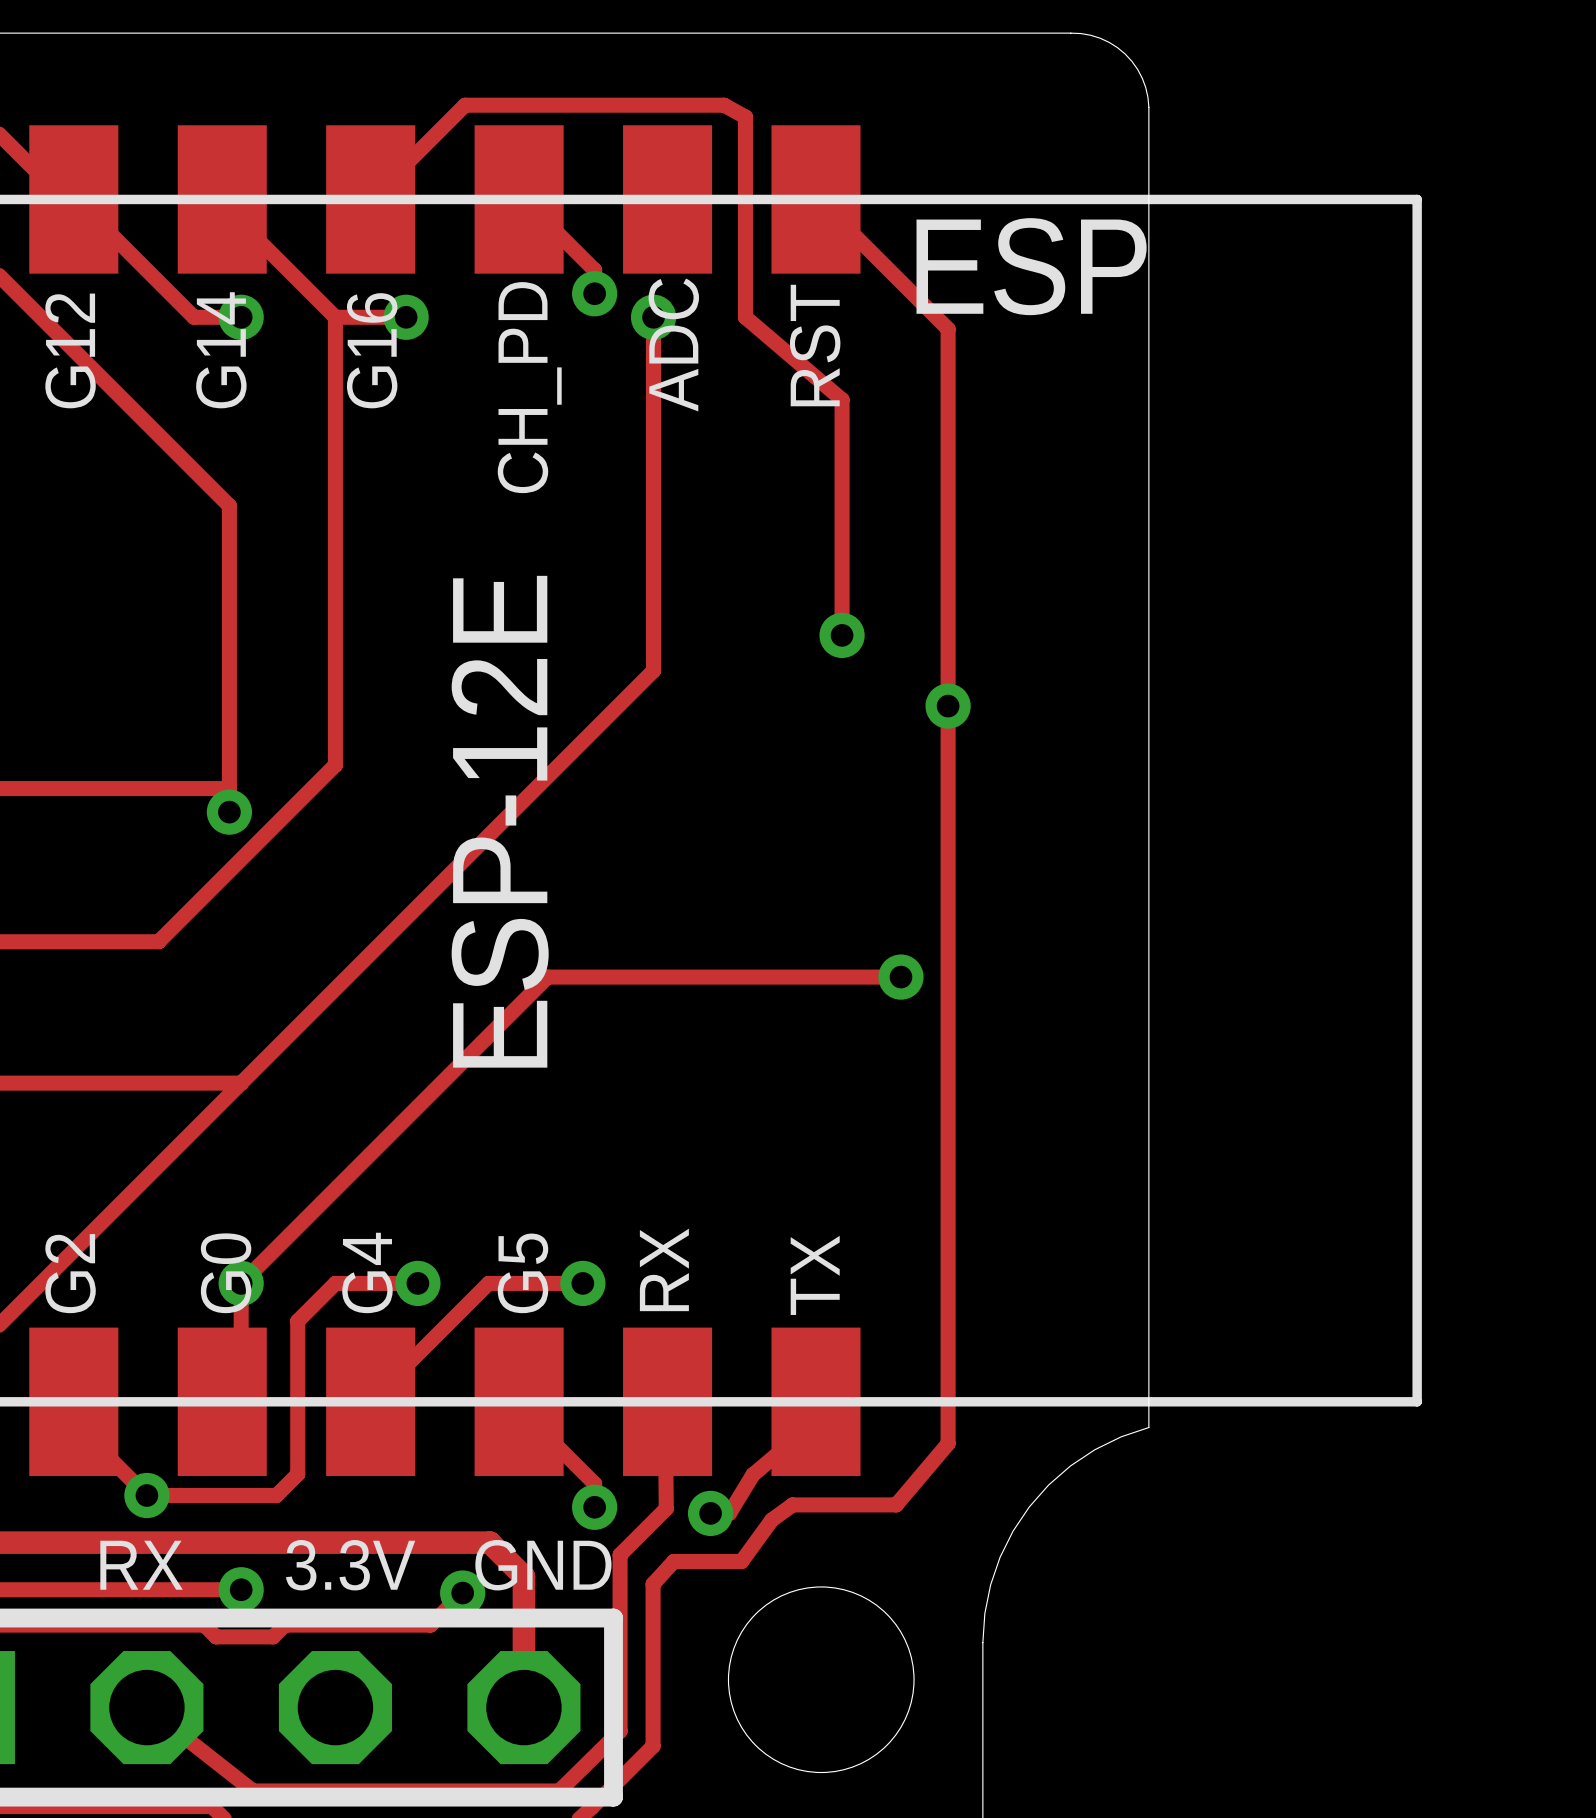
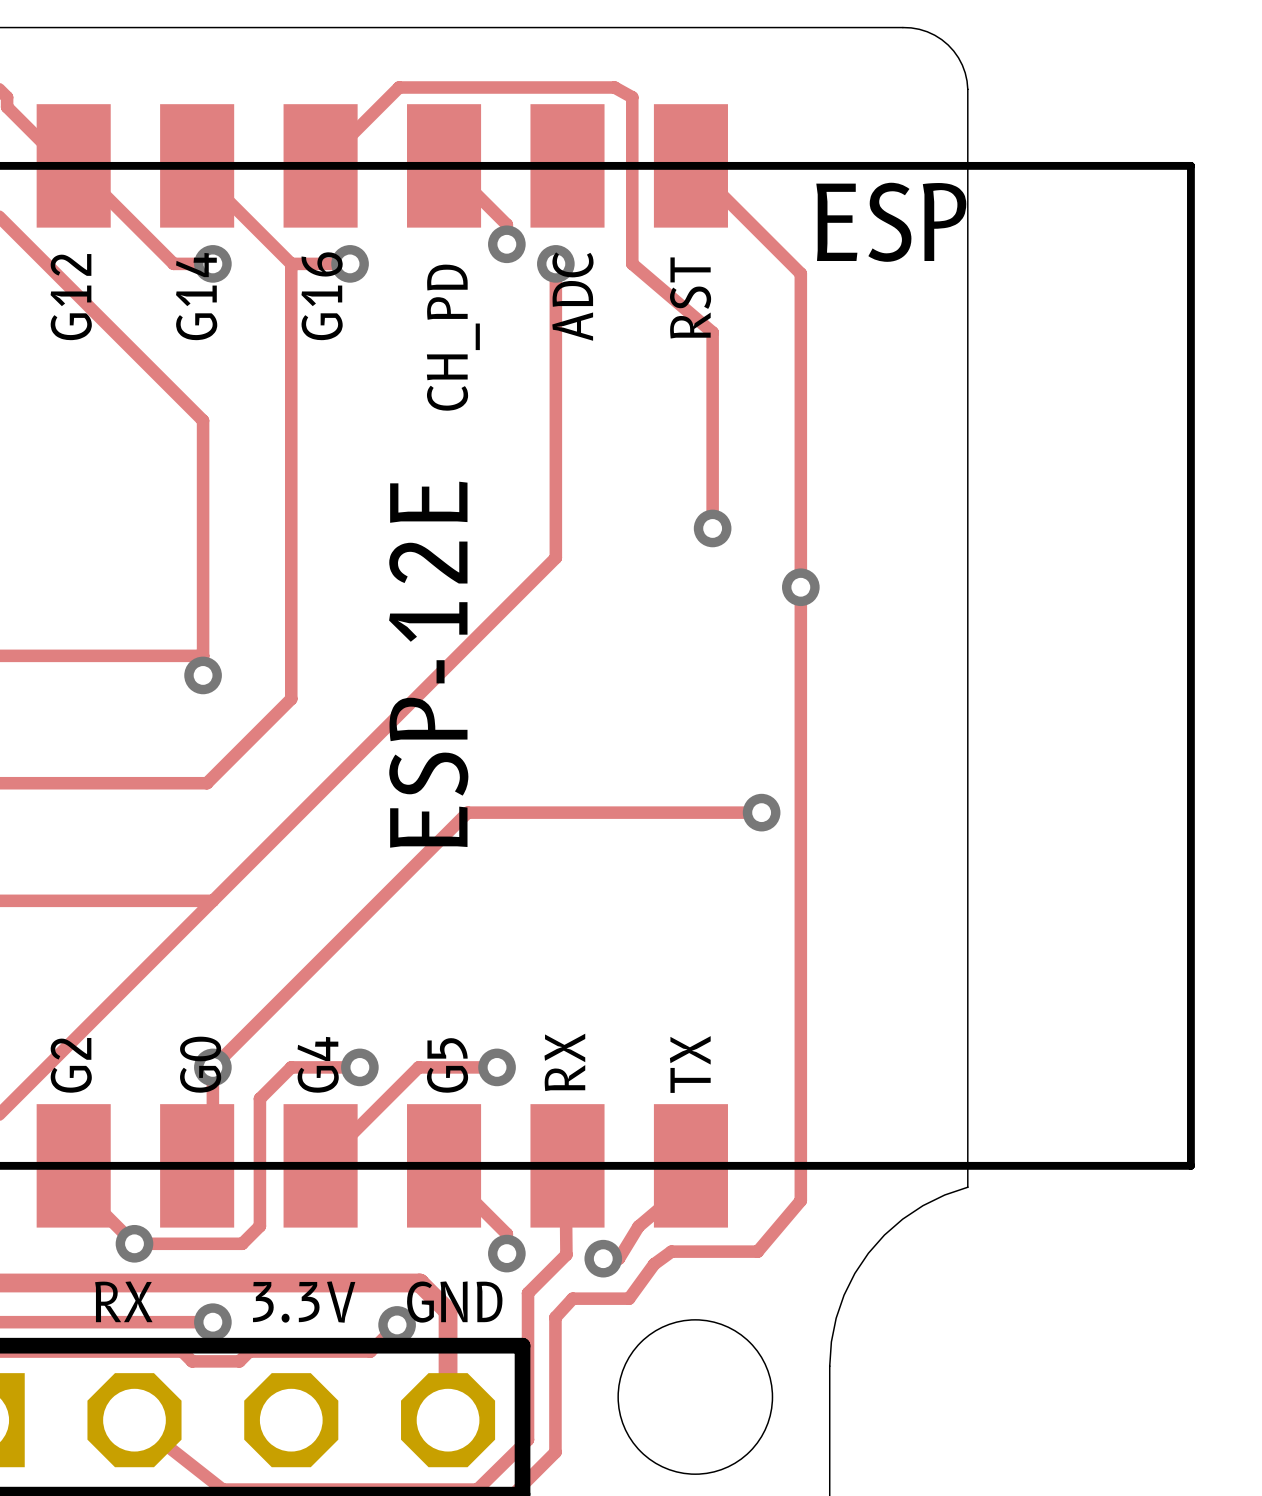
track: (335, 765) (158, 941) -> (291, 636) (291, 698) (207, 783) (144, 783)

